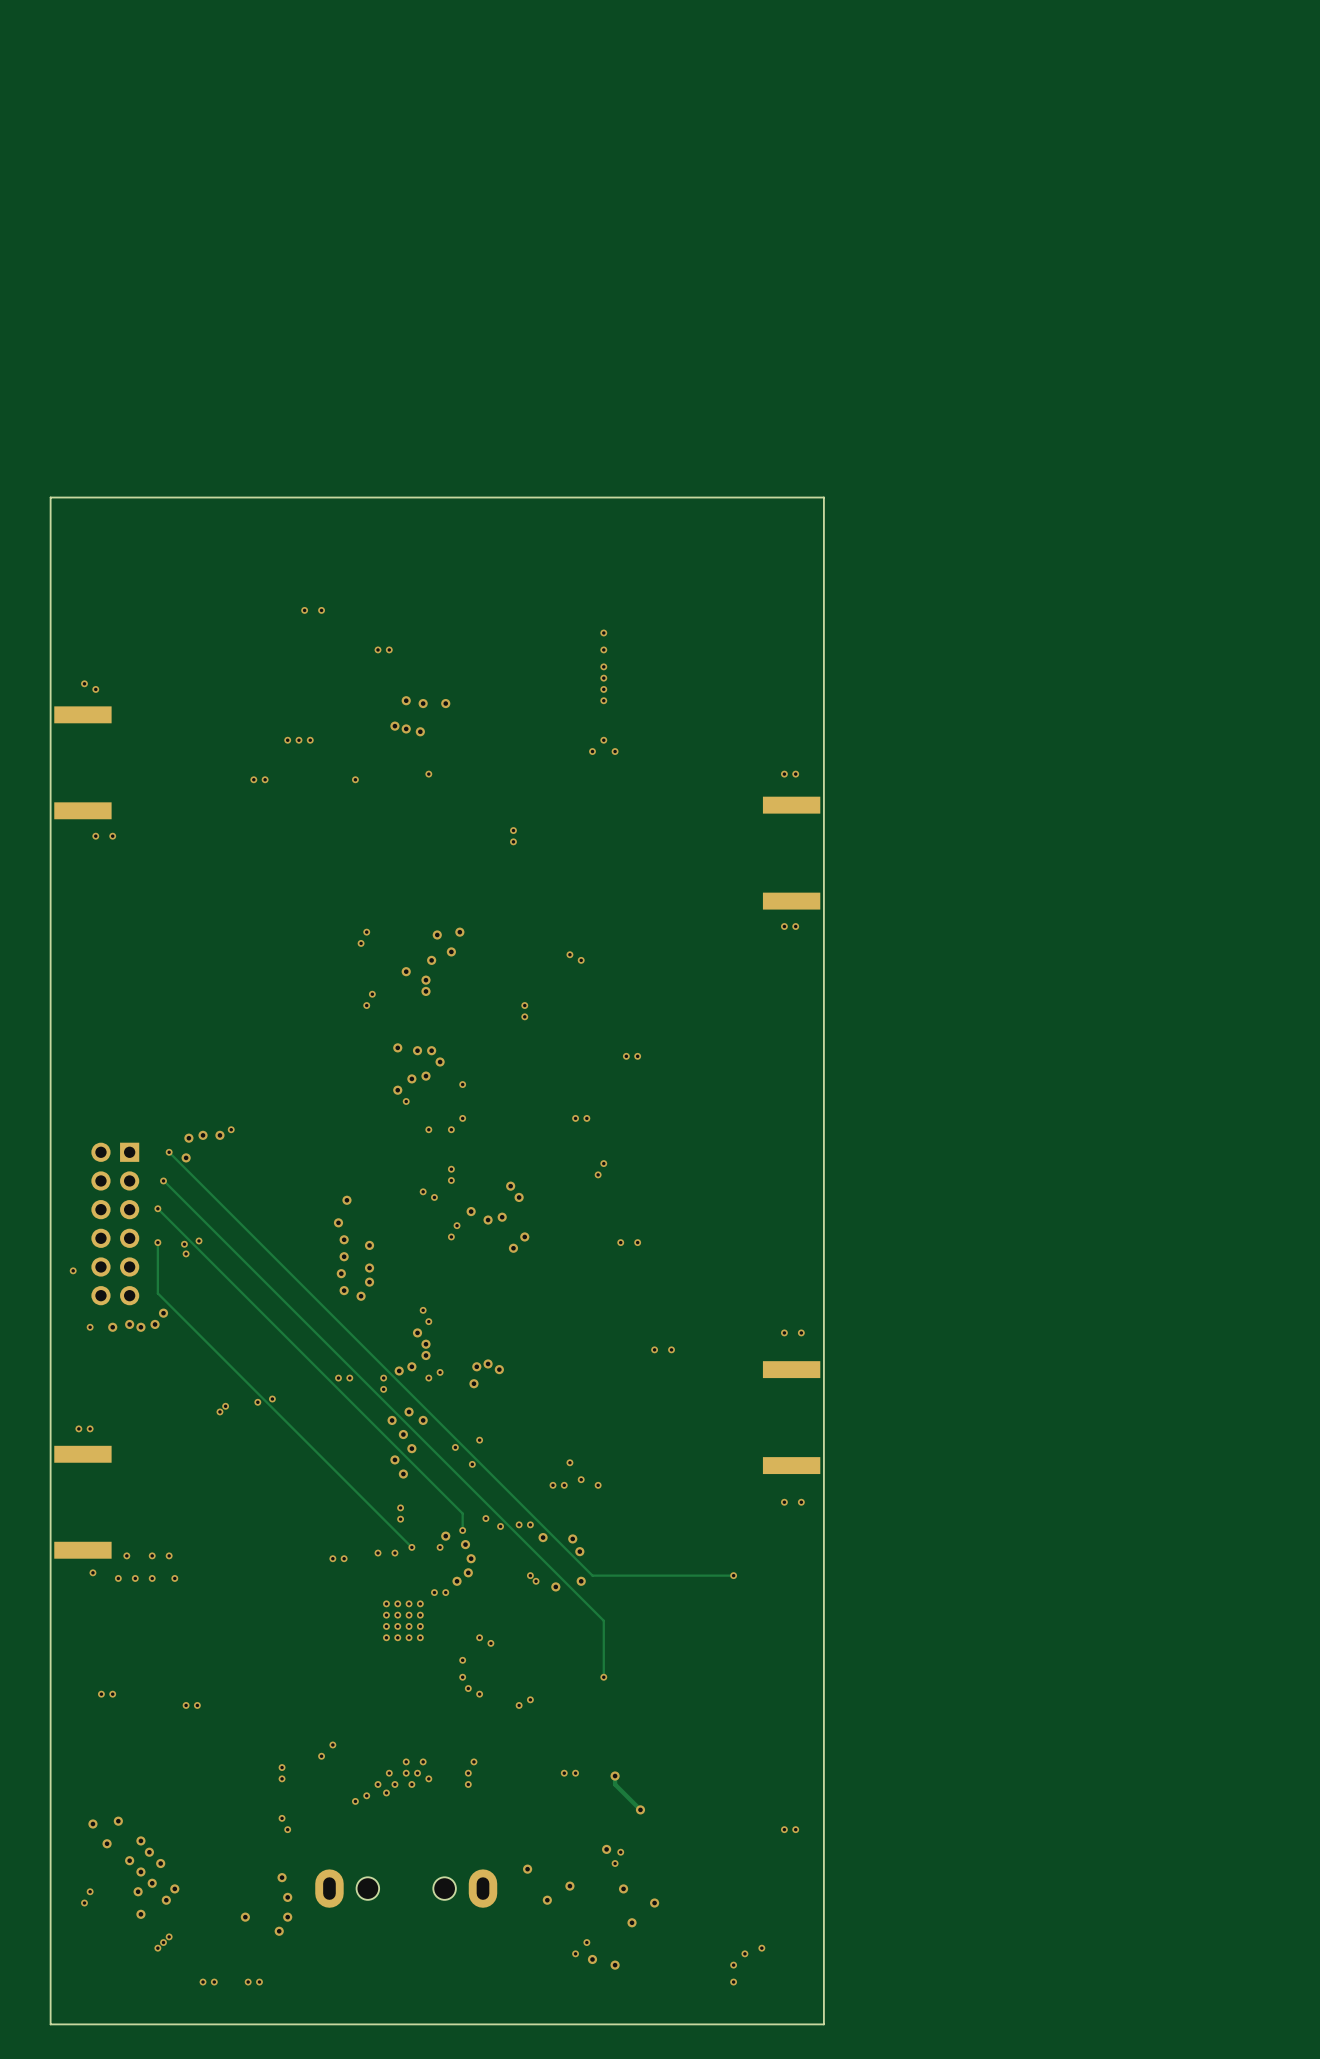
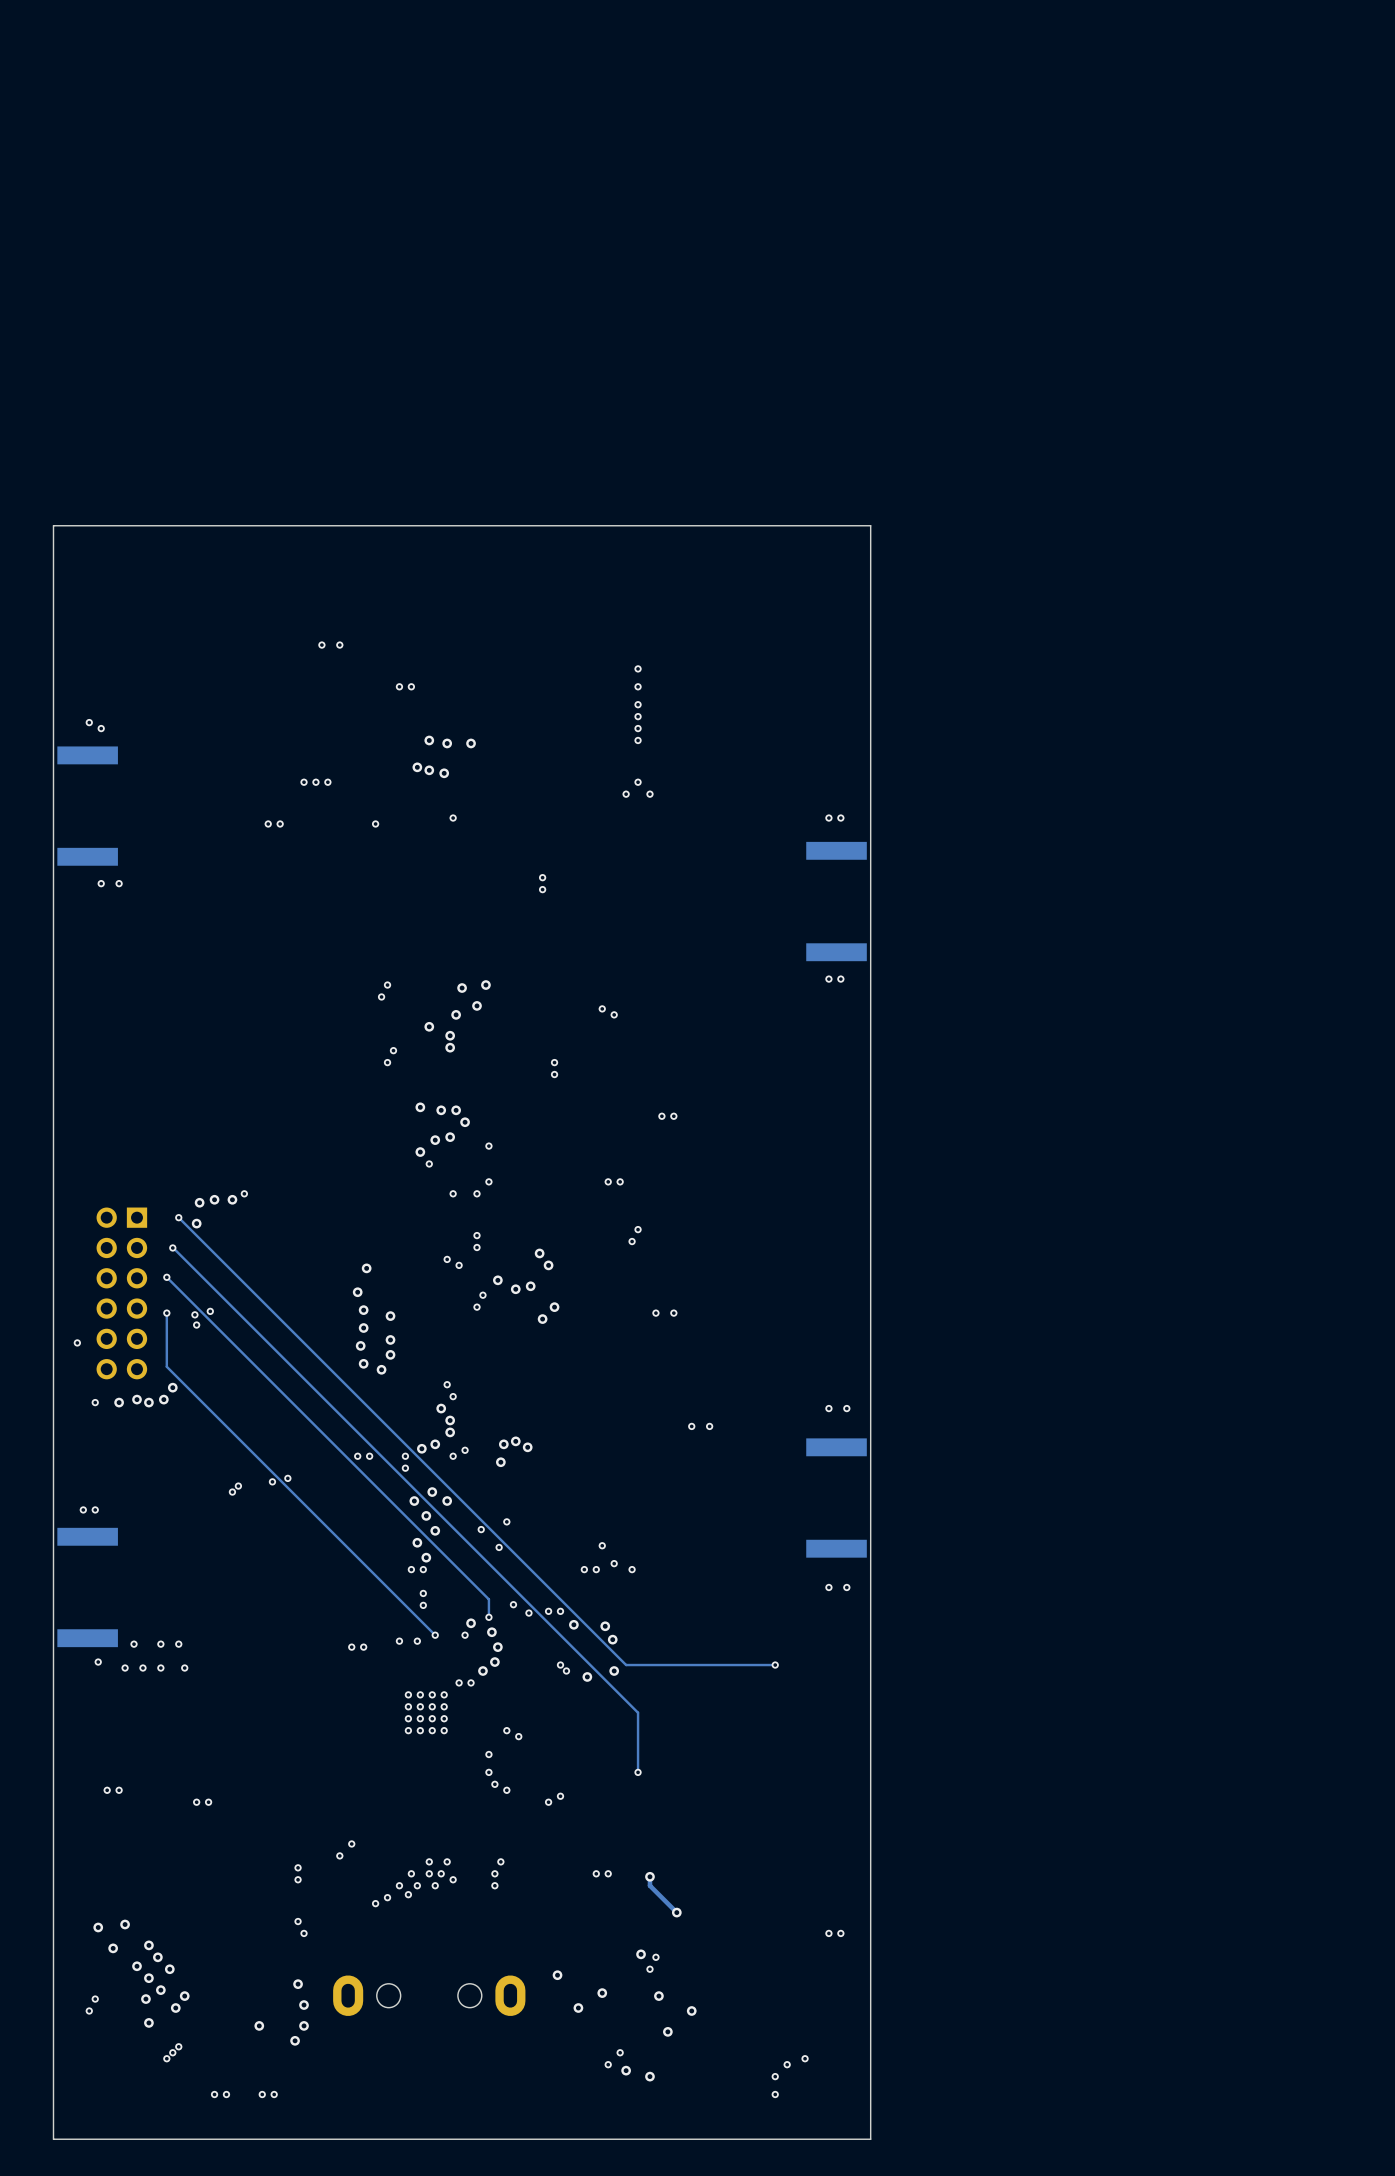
via: none -> (411, 1569)
via: none -> (423, 1569)

